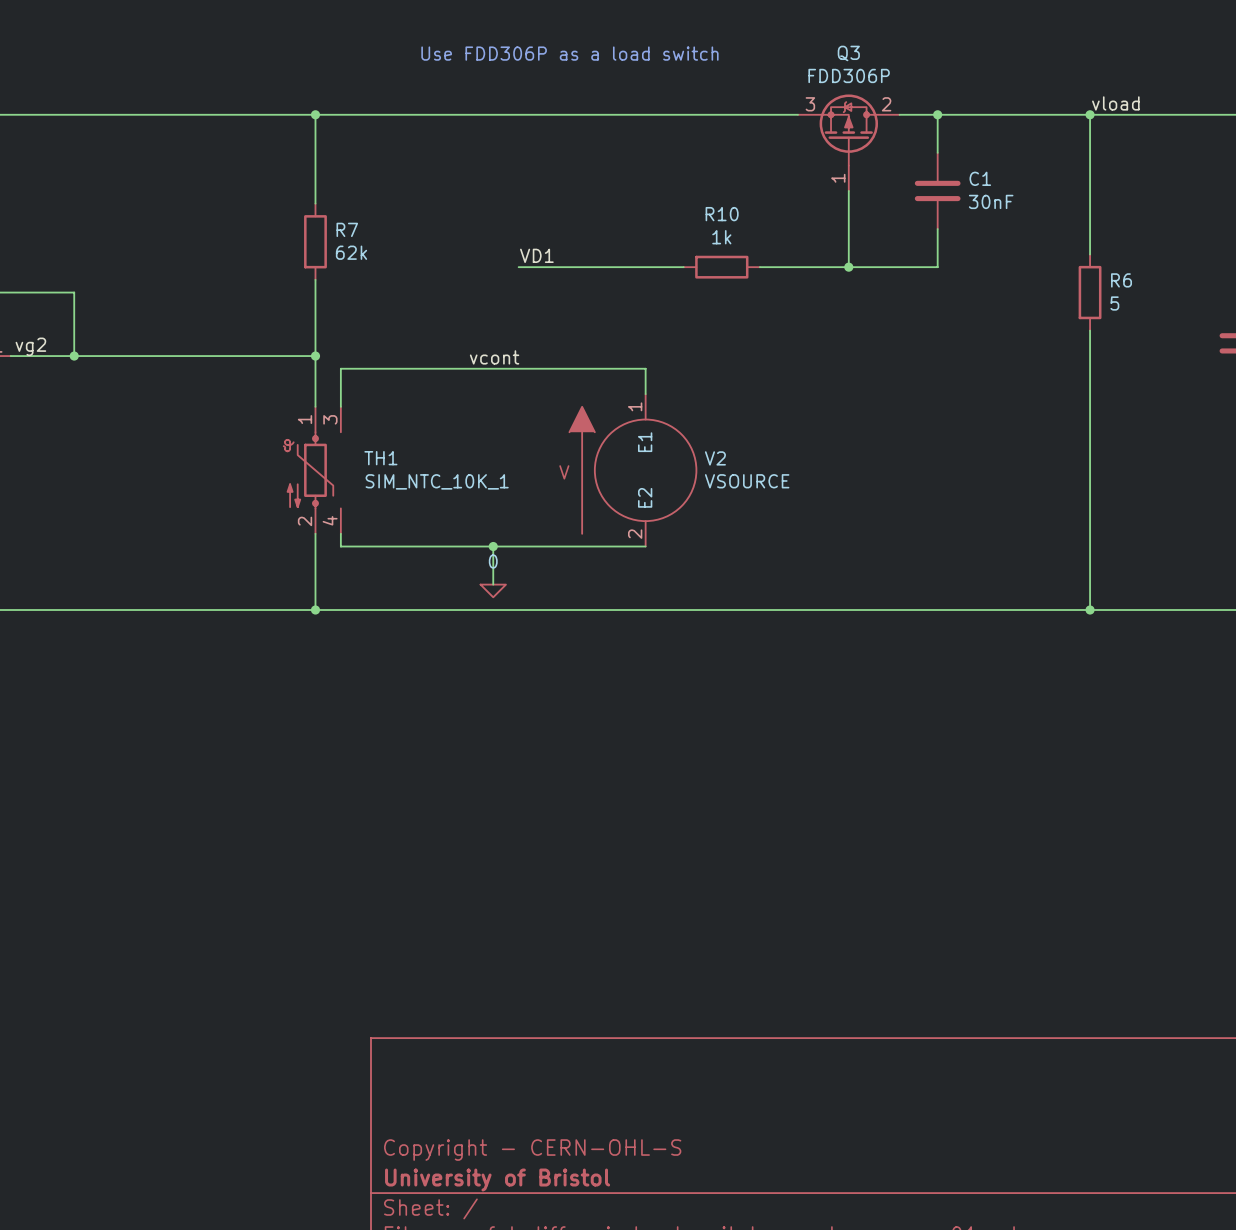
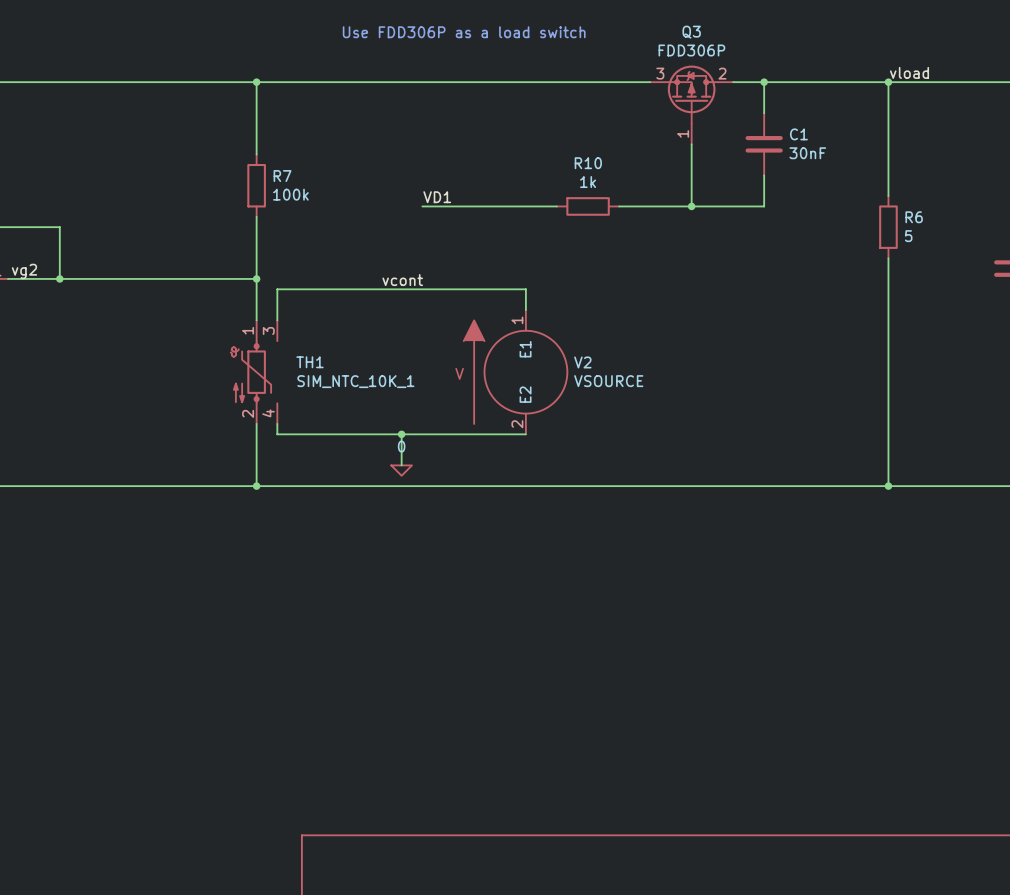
R7 value: 62k (351, 252) -> 100k (290, 194)

